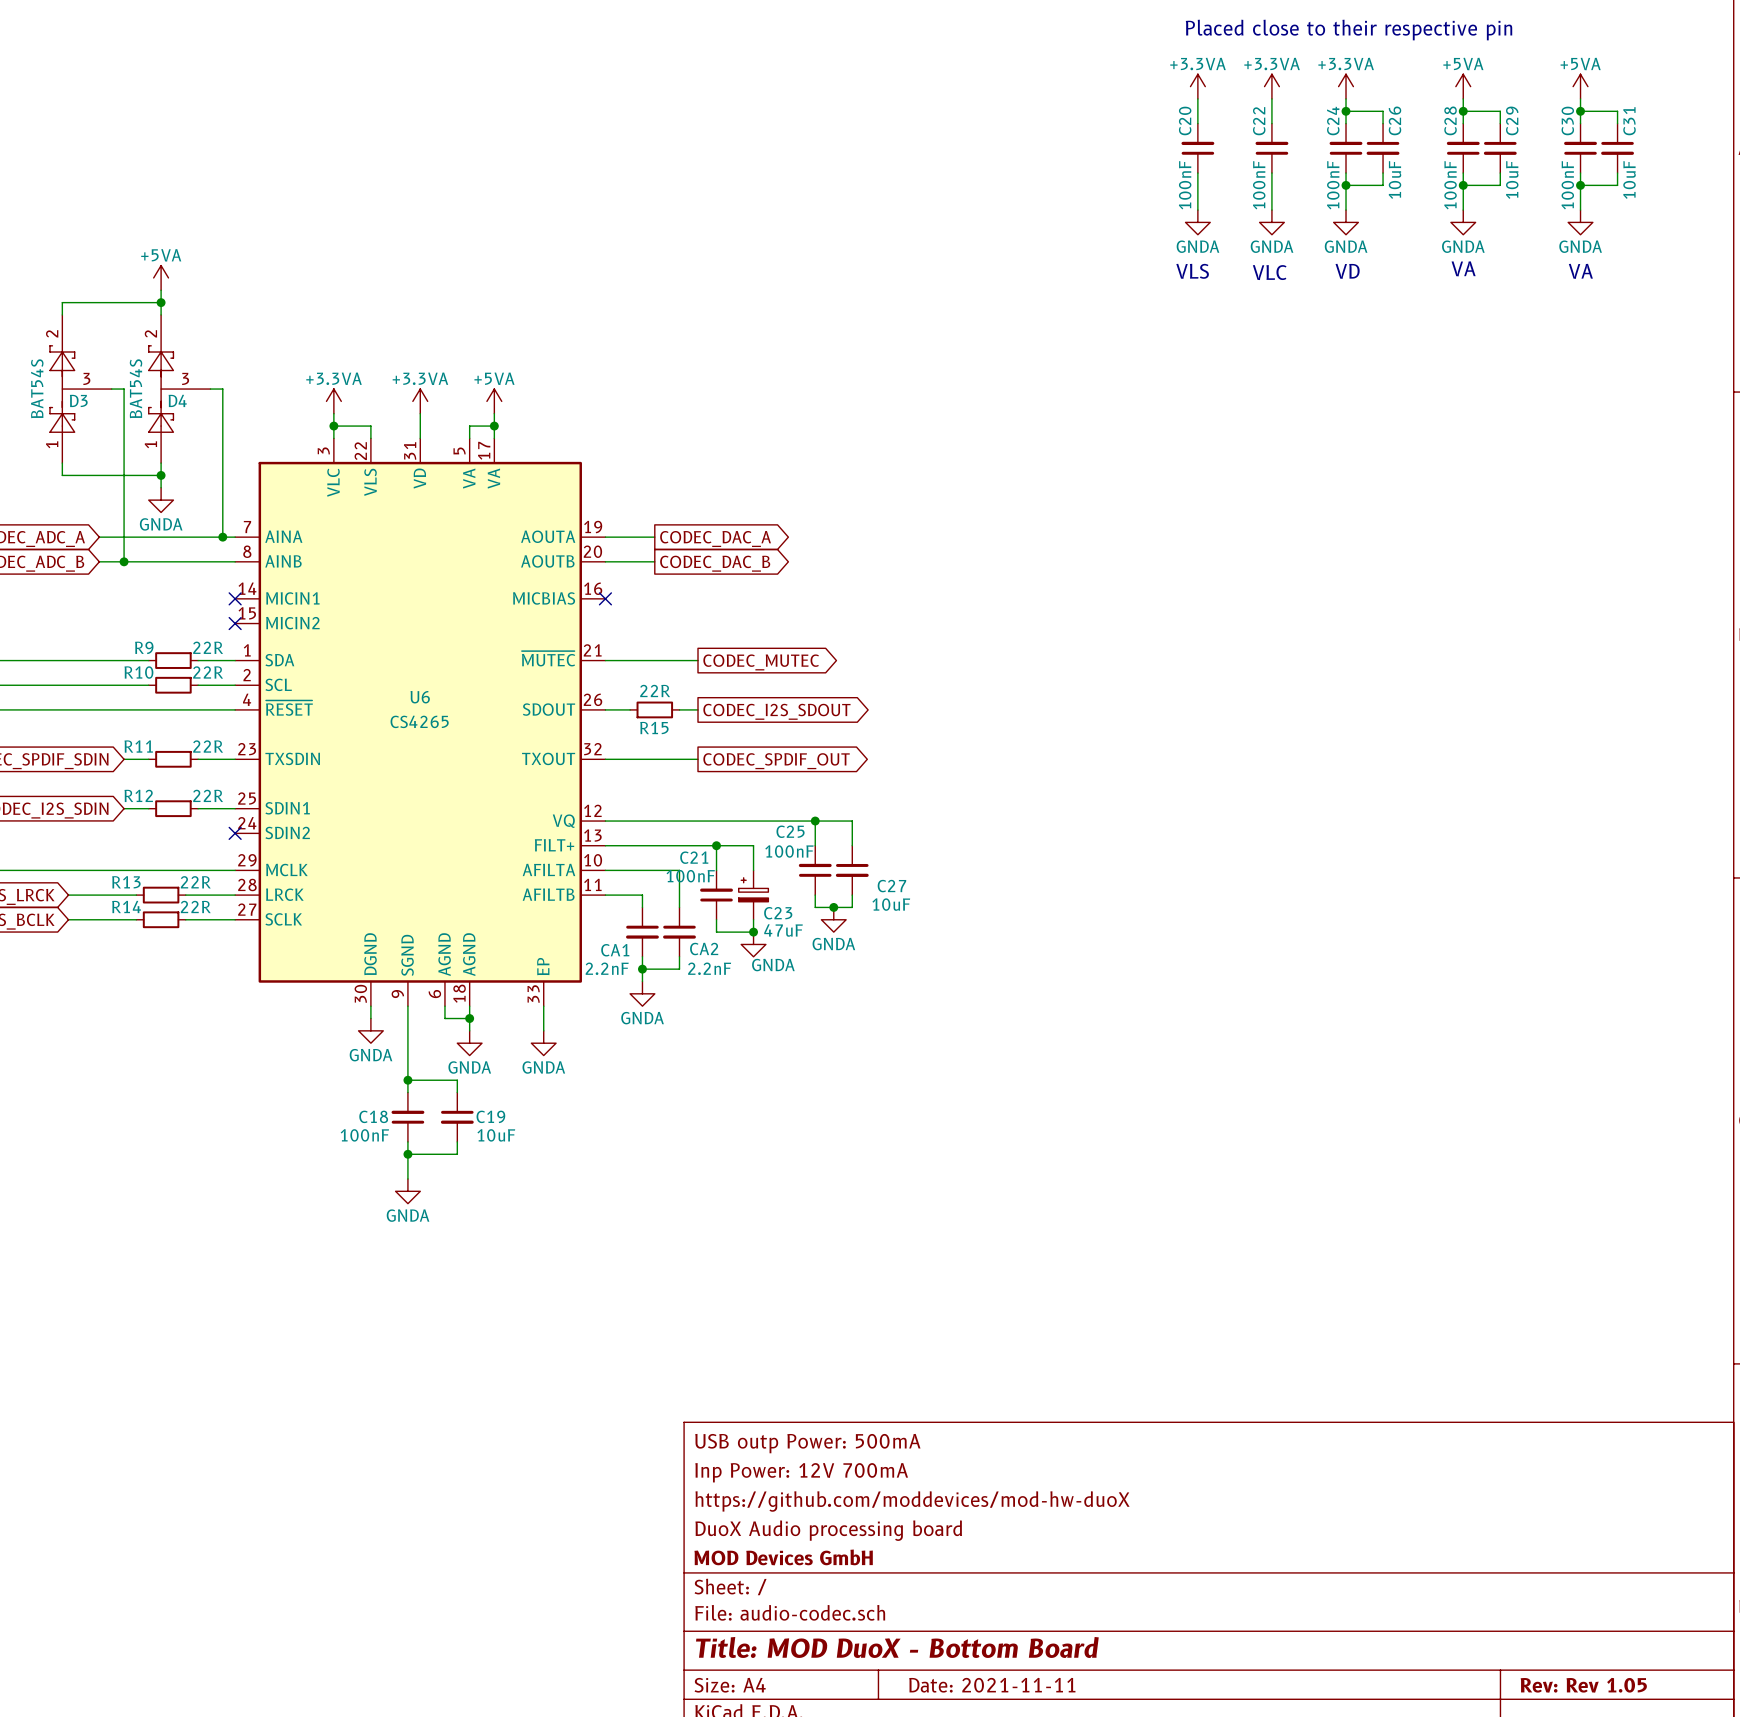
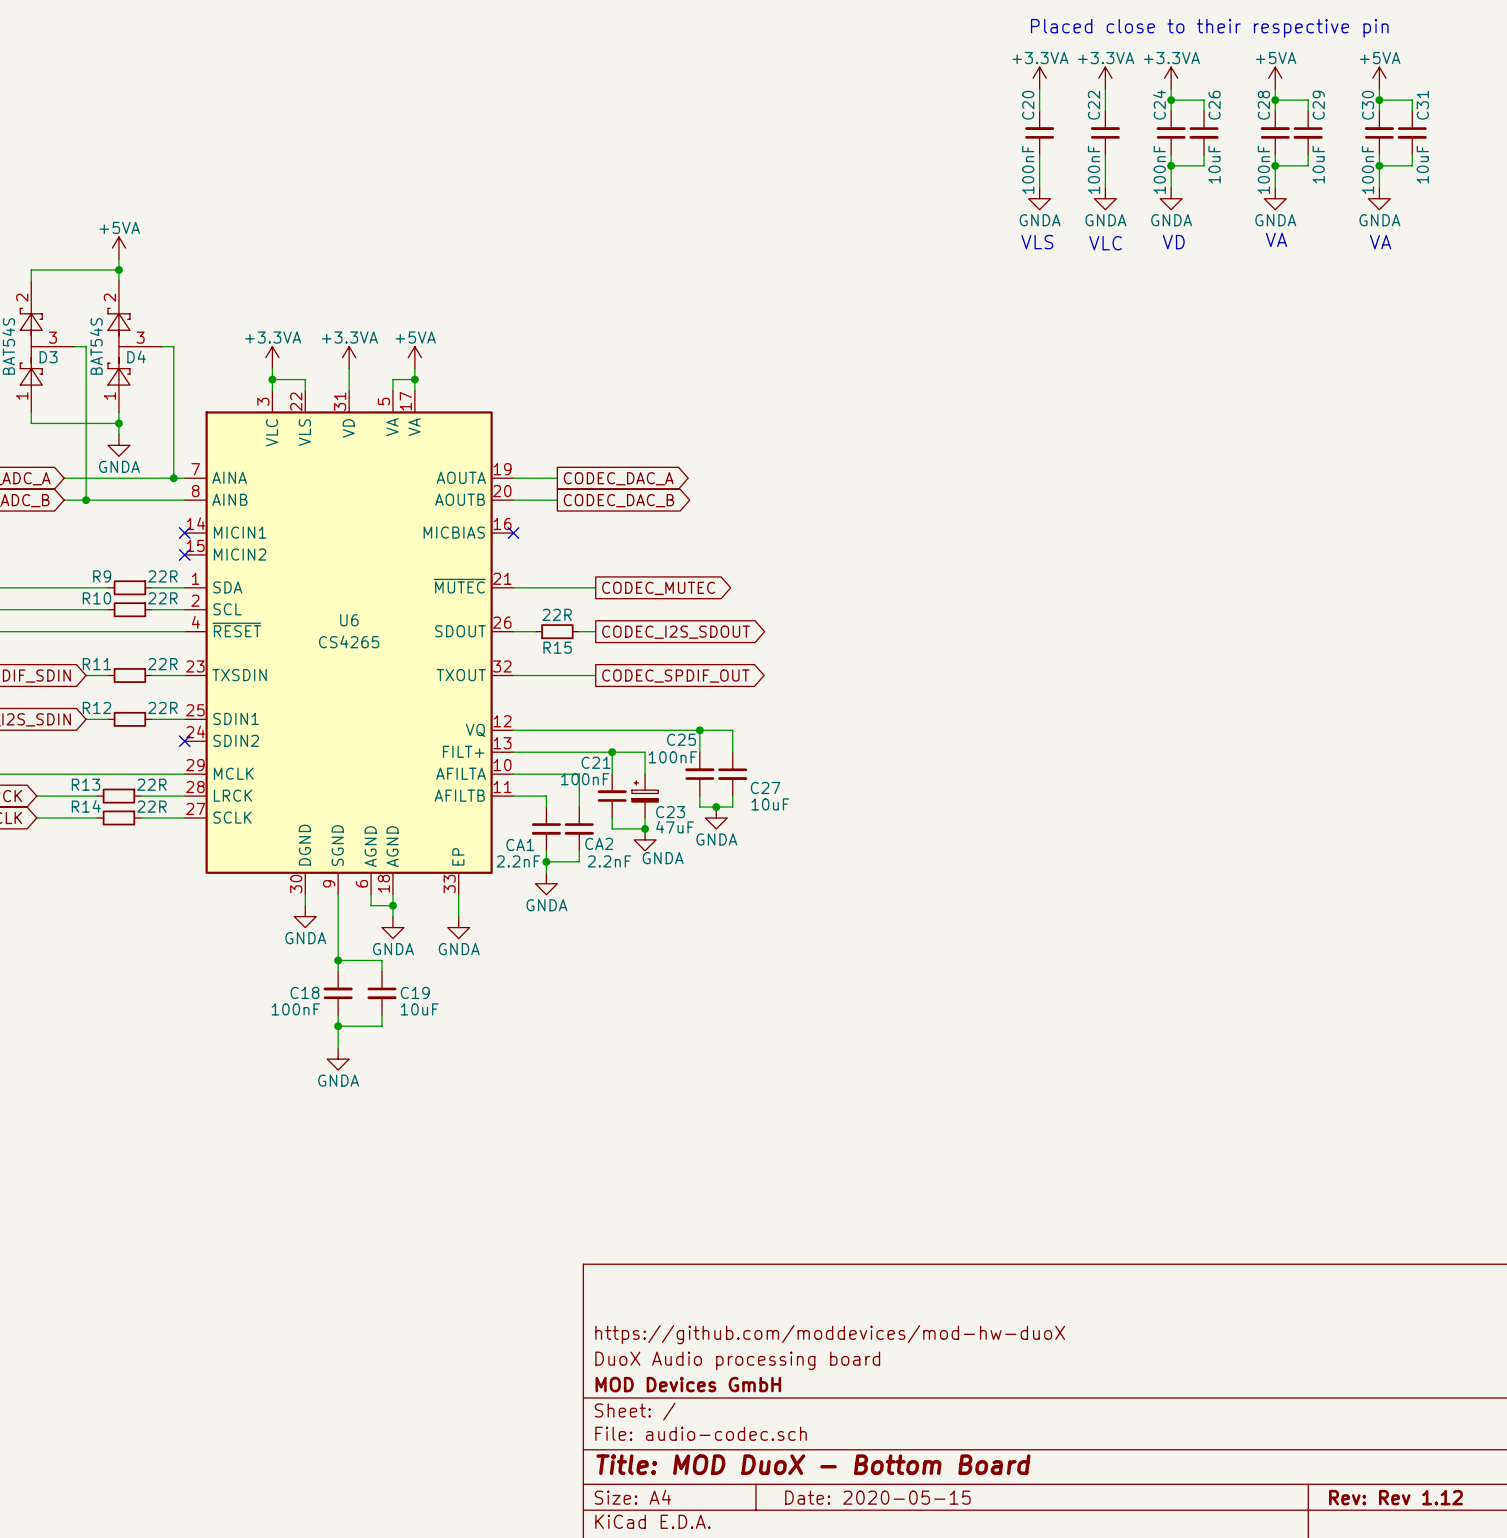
title block: USB outp Power: 500mA (807, 1443) -> none
title block: Inp Power: 12V 700mA (801, 1472) -> none
title block: Date: 2021-11-11 (992, 1685) -> Date: 2020-05-15 (877, 1497)
title block: Rev: Rev 1.05 (1583, 1685) -> Rev: Rev 1.12 (1395, 1497)

